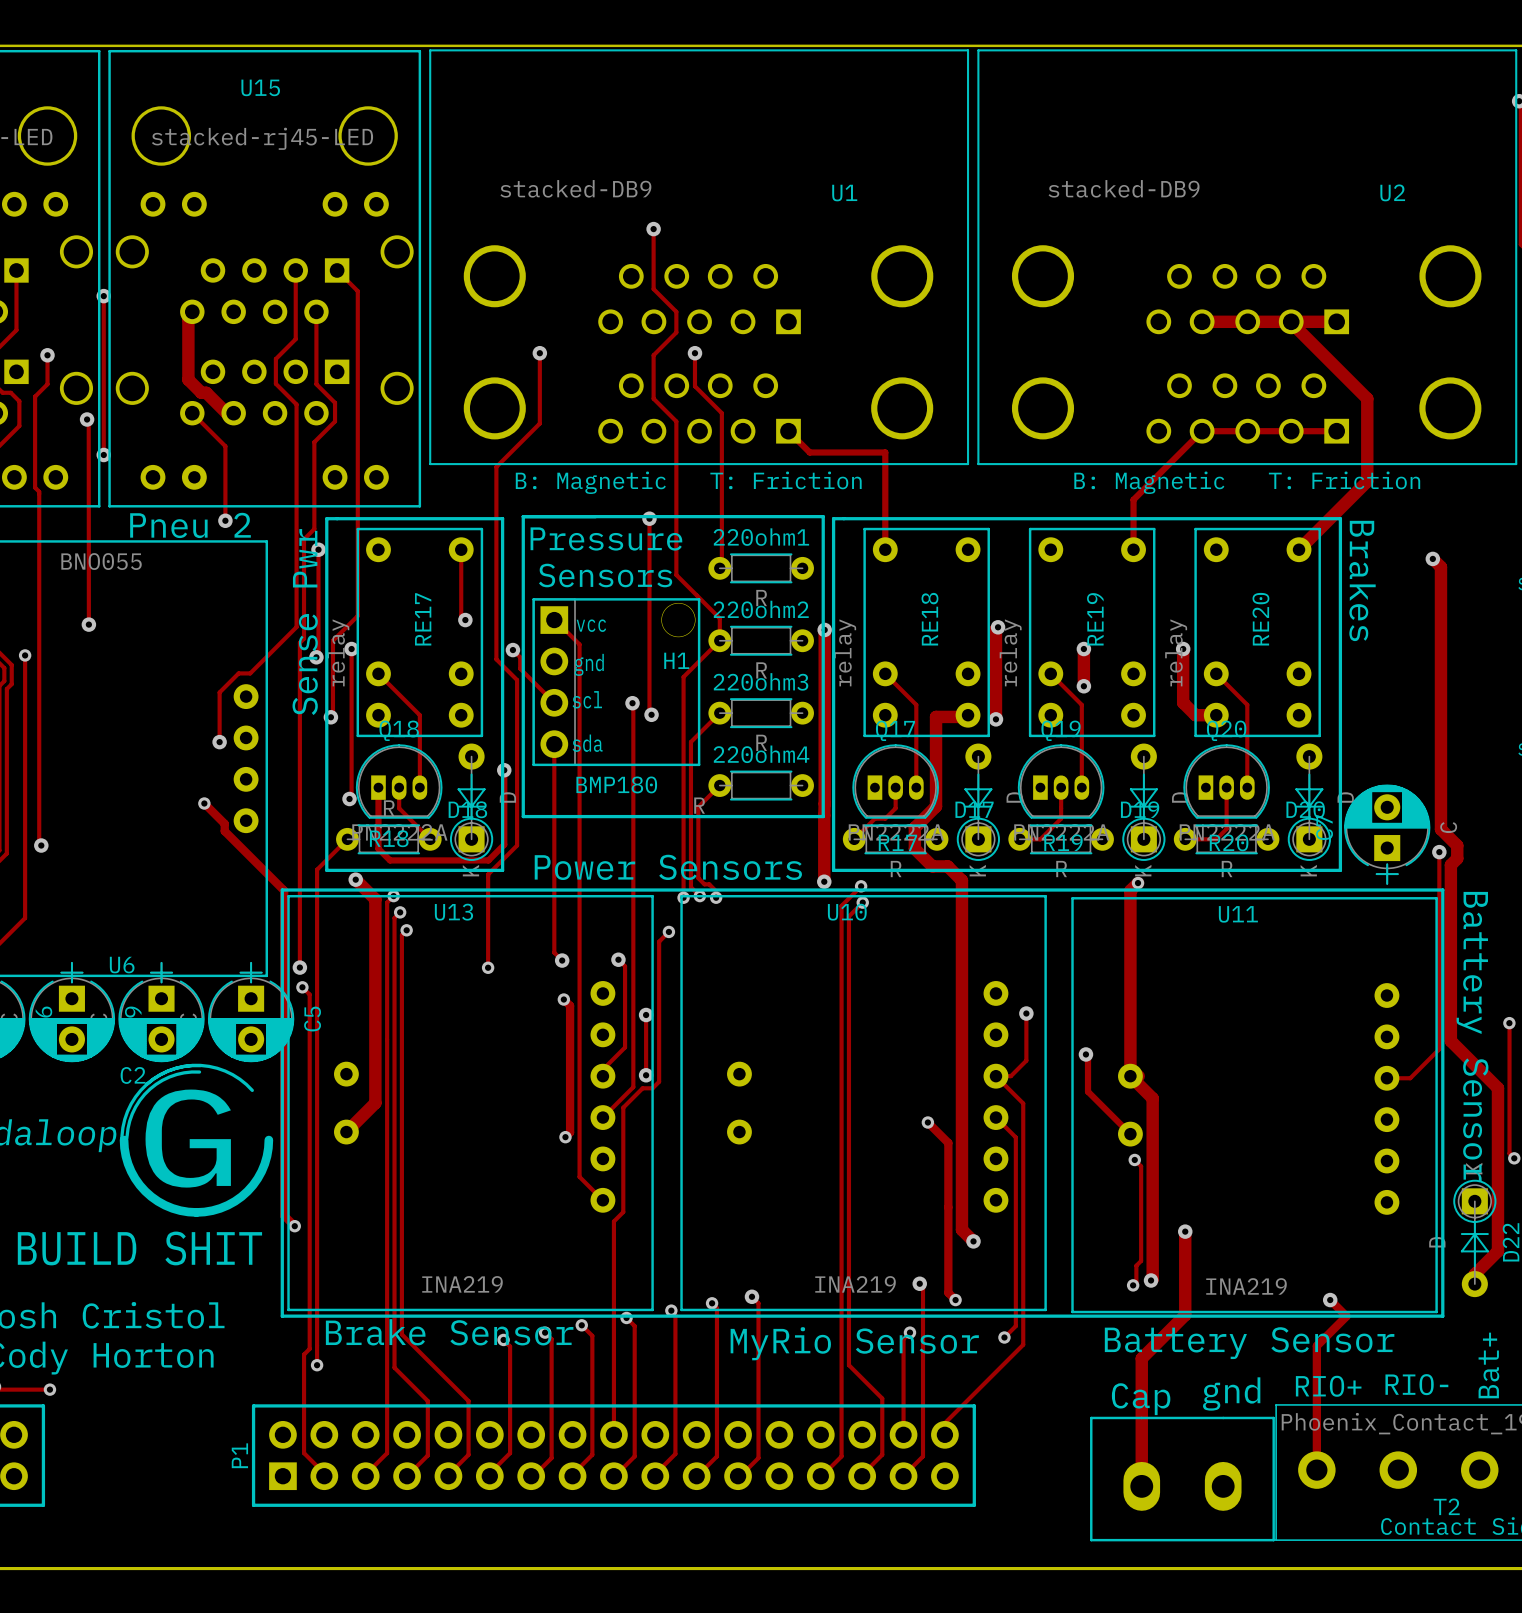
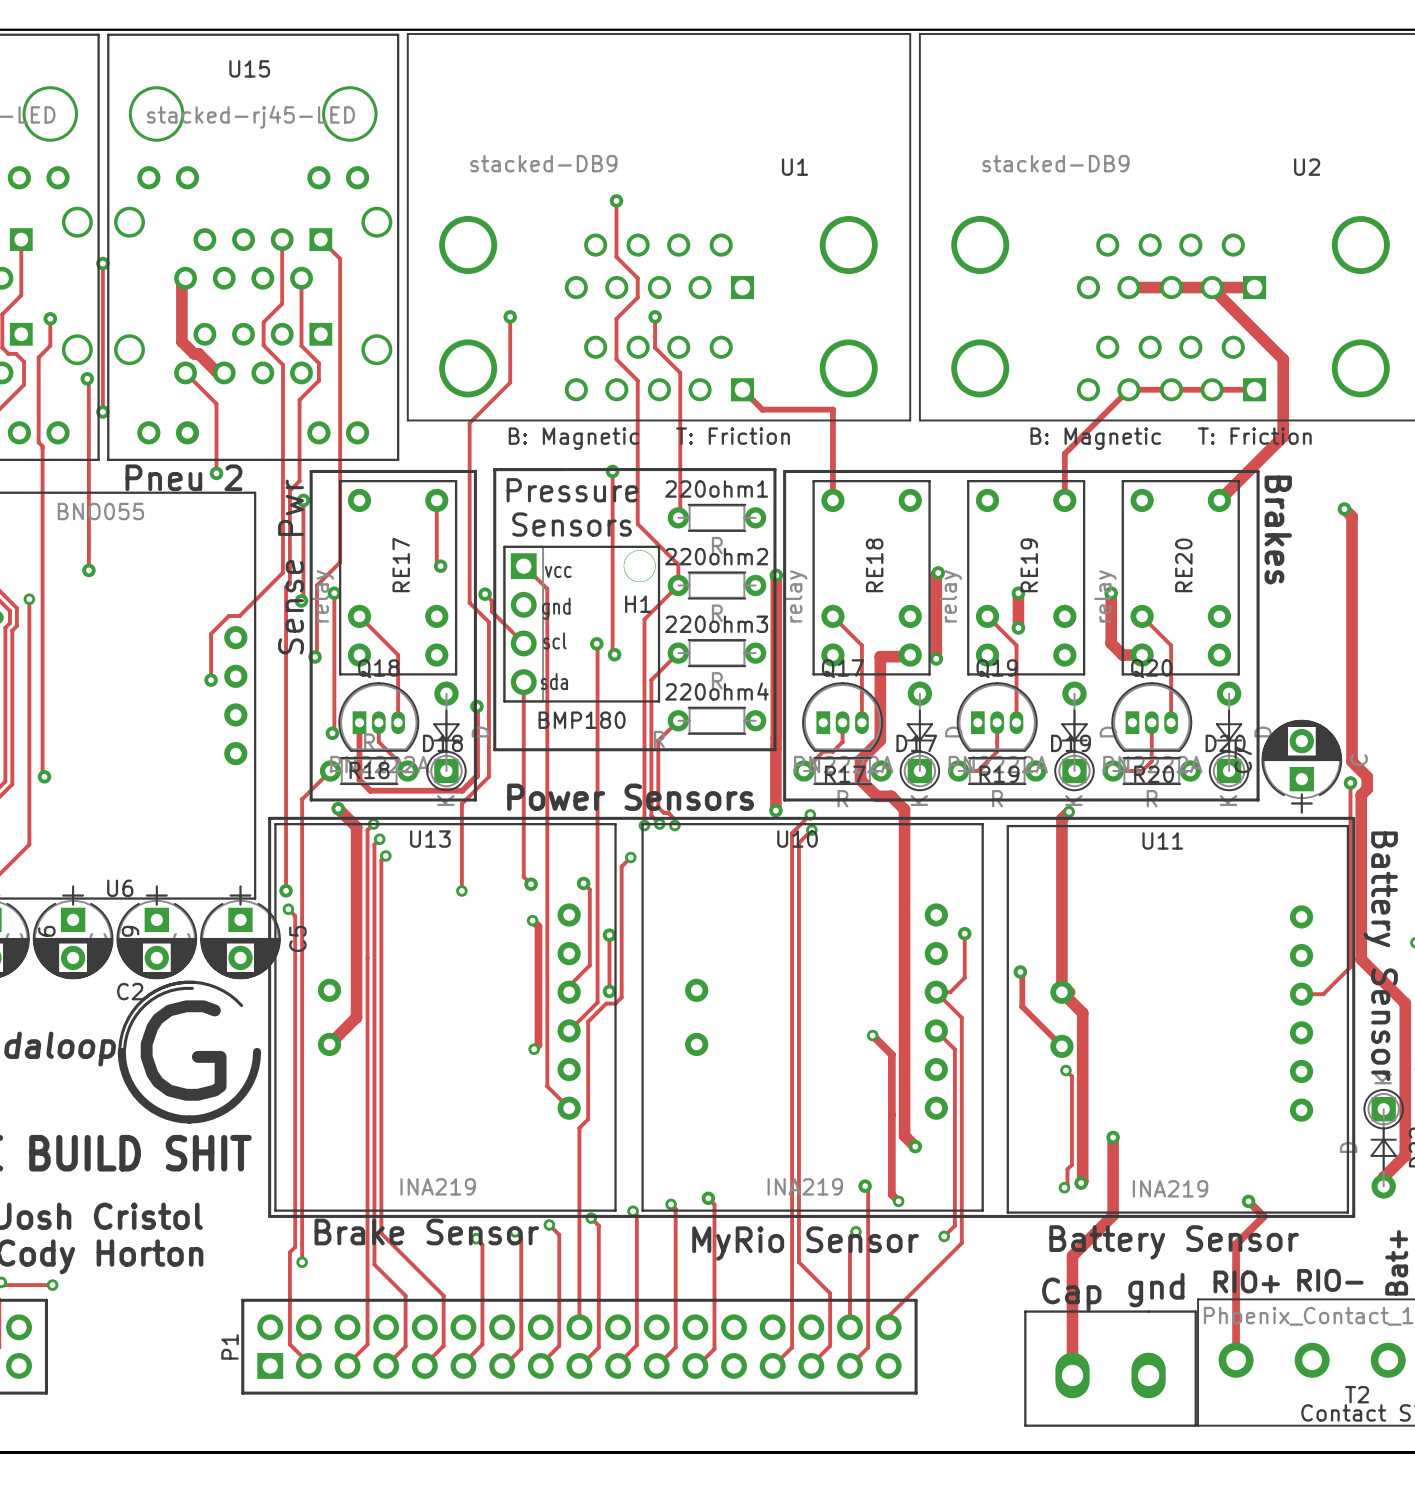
track: (204, 803) (224, 823) (224, 831) (284, 890) (284, 1215) (294, 1226) -> none
via: (204, 803) -> none
via: (294, 1226) -> none

